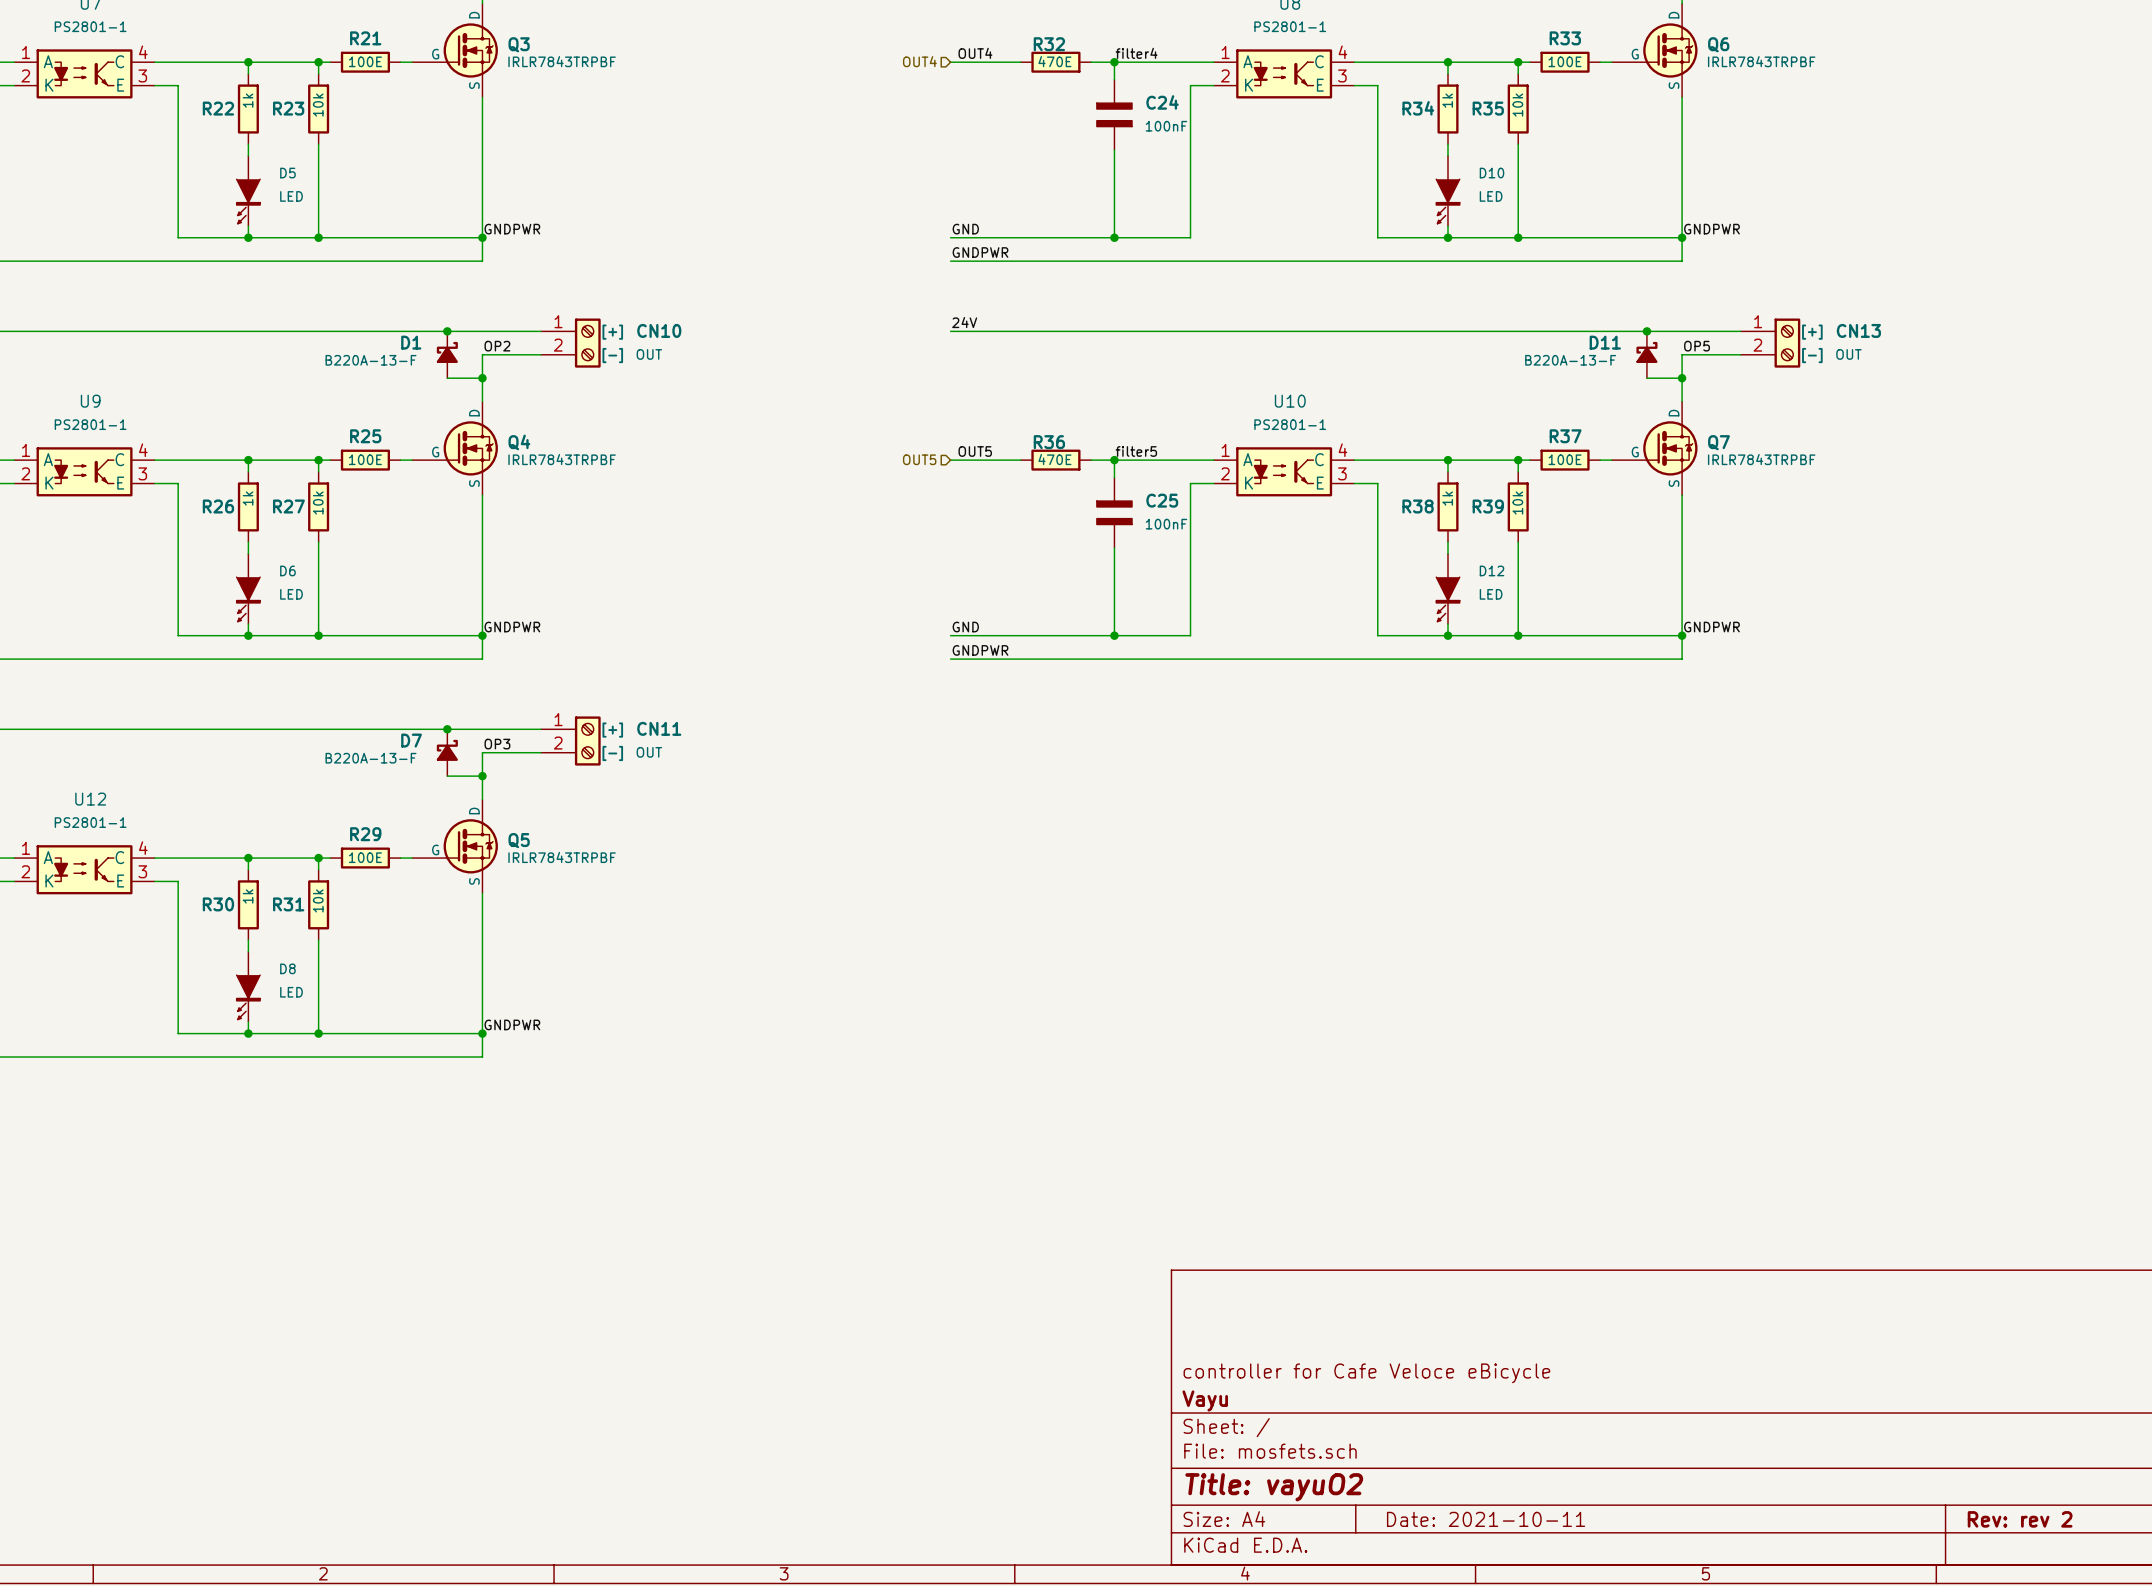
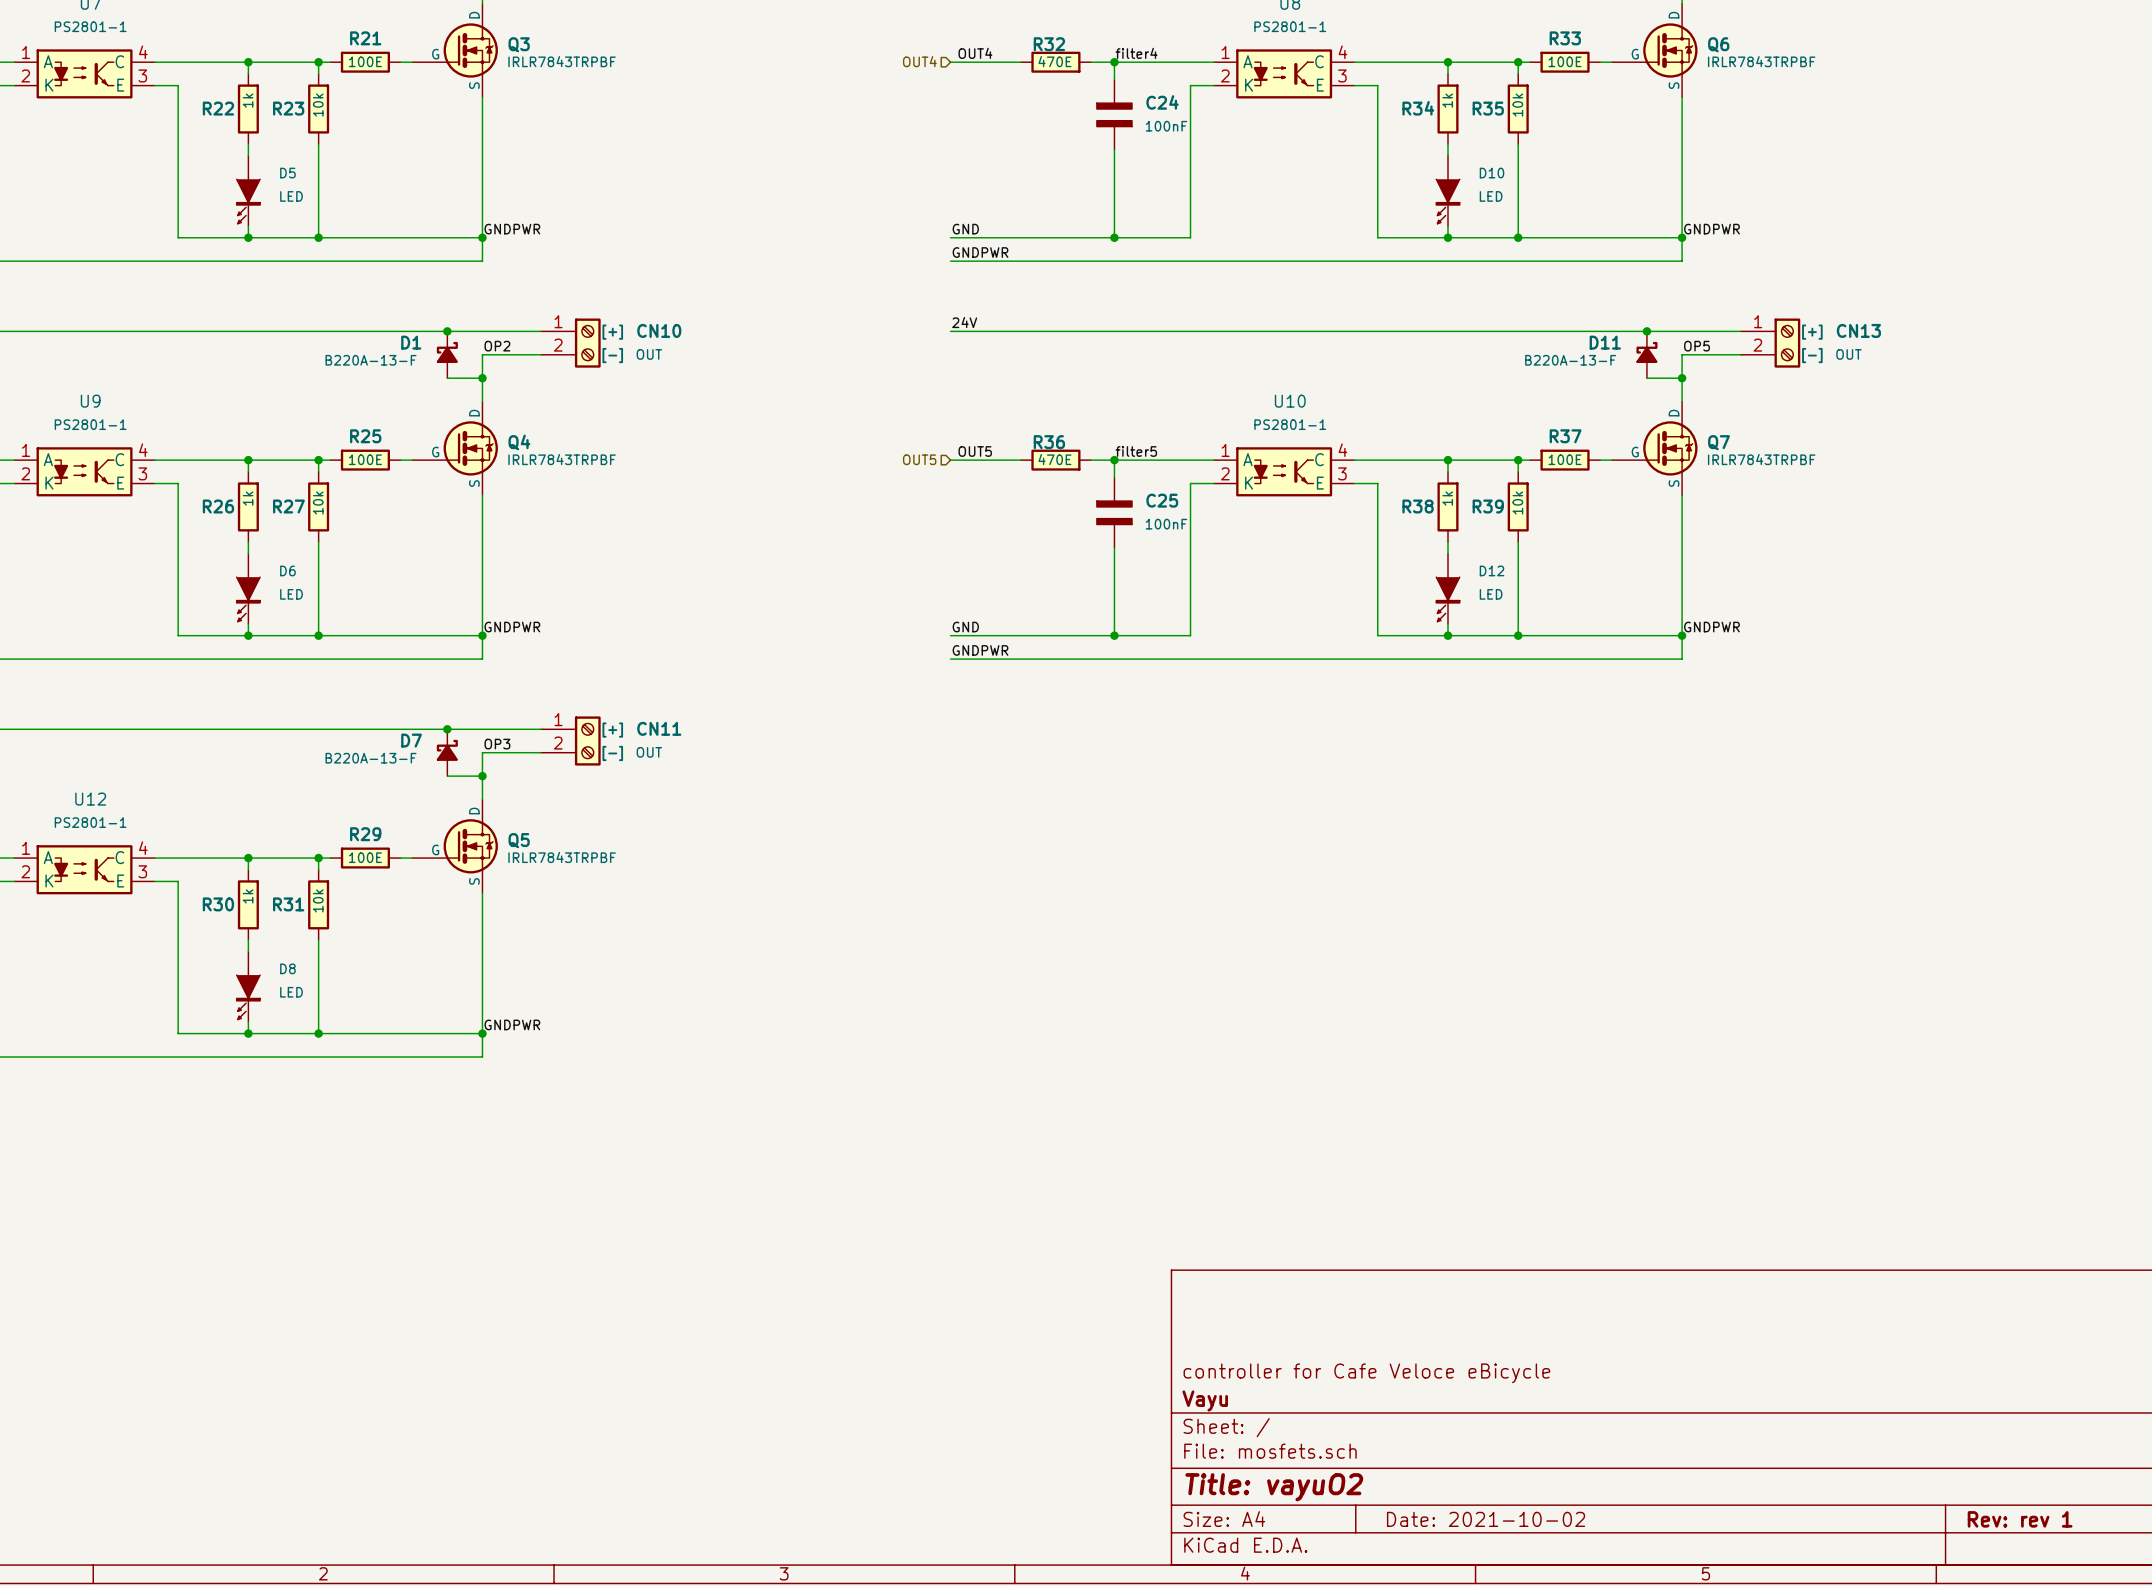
title block: Date: 2021-10-11 (1486, 1519) -> Date: 2021-10-02 (1486, 1519)
title block: Rev: rev 2 (2020, 1519) -> Rev: rev 1 (2020, 1519)

